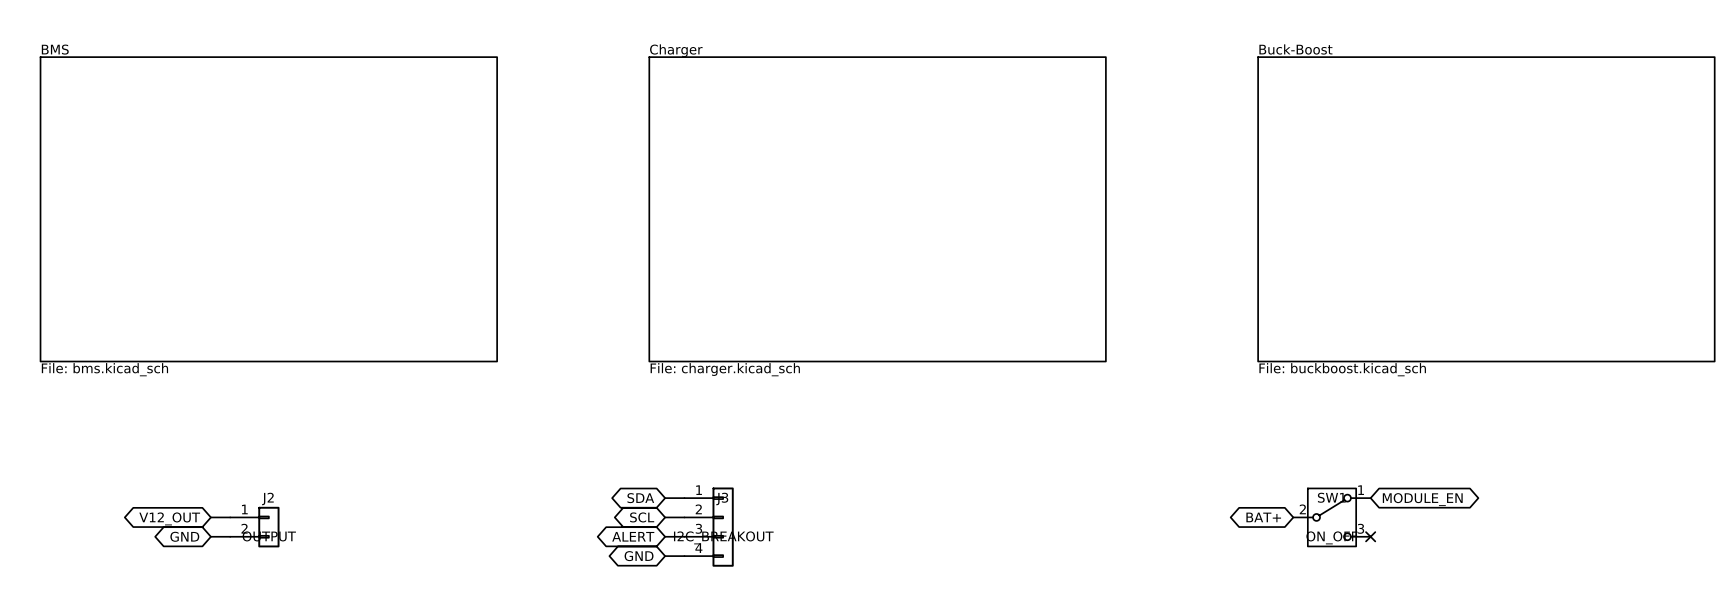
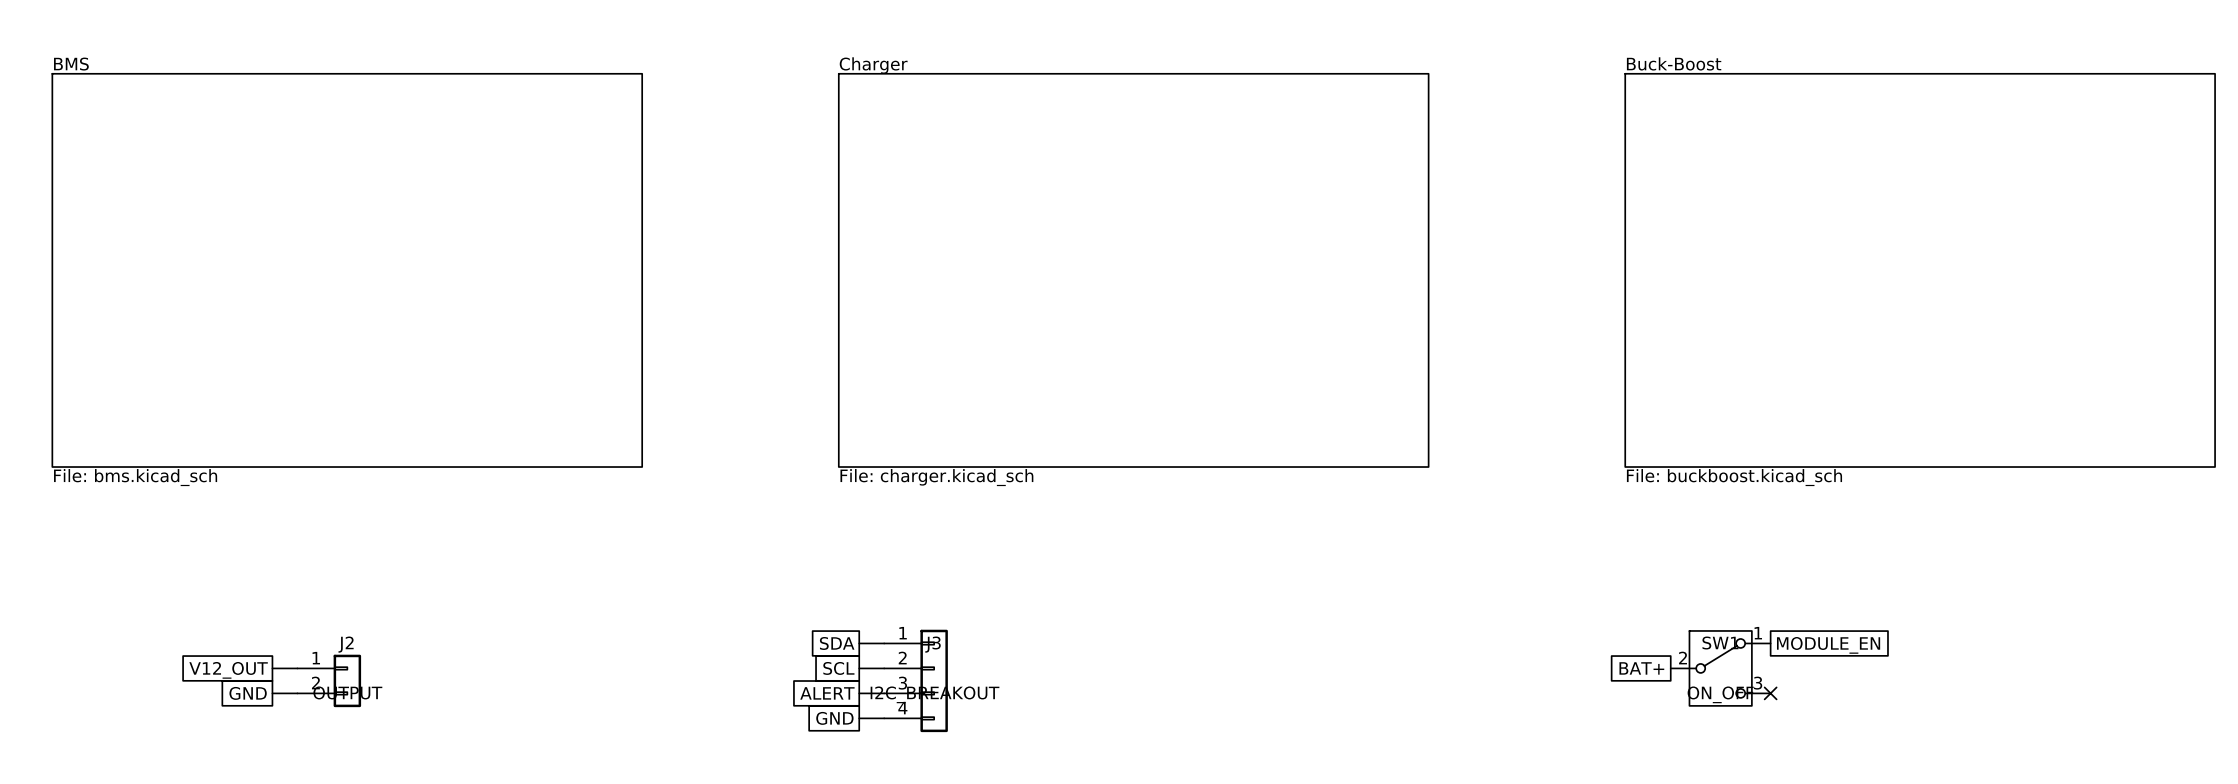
global label shape: bidirectional (640, 498) -> passive (837, 643)
global label shape: bidirectional (1422, 499) -> passive (1828, 645)
global label shape: bidirectional (642, 517) -> passive (838, 668)
global label shape: bidirectional (1263, 517) -> passive (1641, 668)
global label shape: bidirectional (169, 518) -> passive (228, 670)
global label shape: bidirectional (184, 536) -> passive (248, 693)
global label shape: bidirectional (633, 536) -> passive (827, 693)
global label shape: bidirectional (639, 556) -> passive (834, 718)

